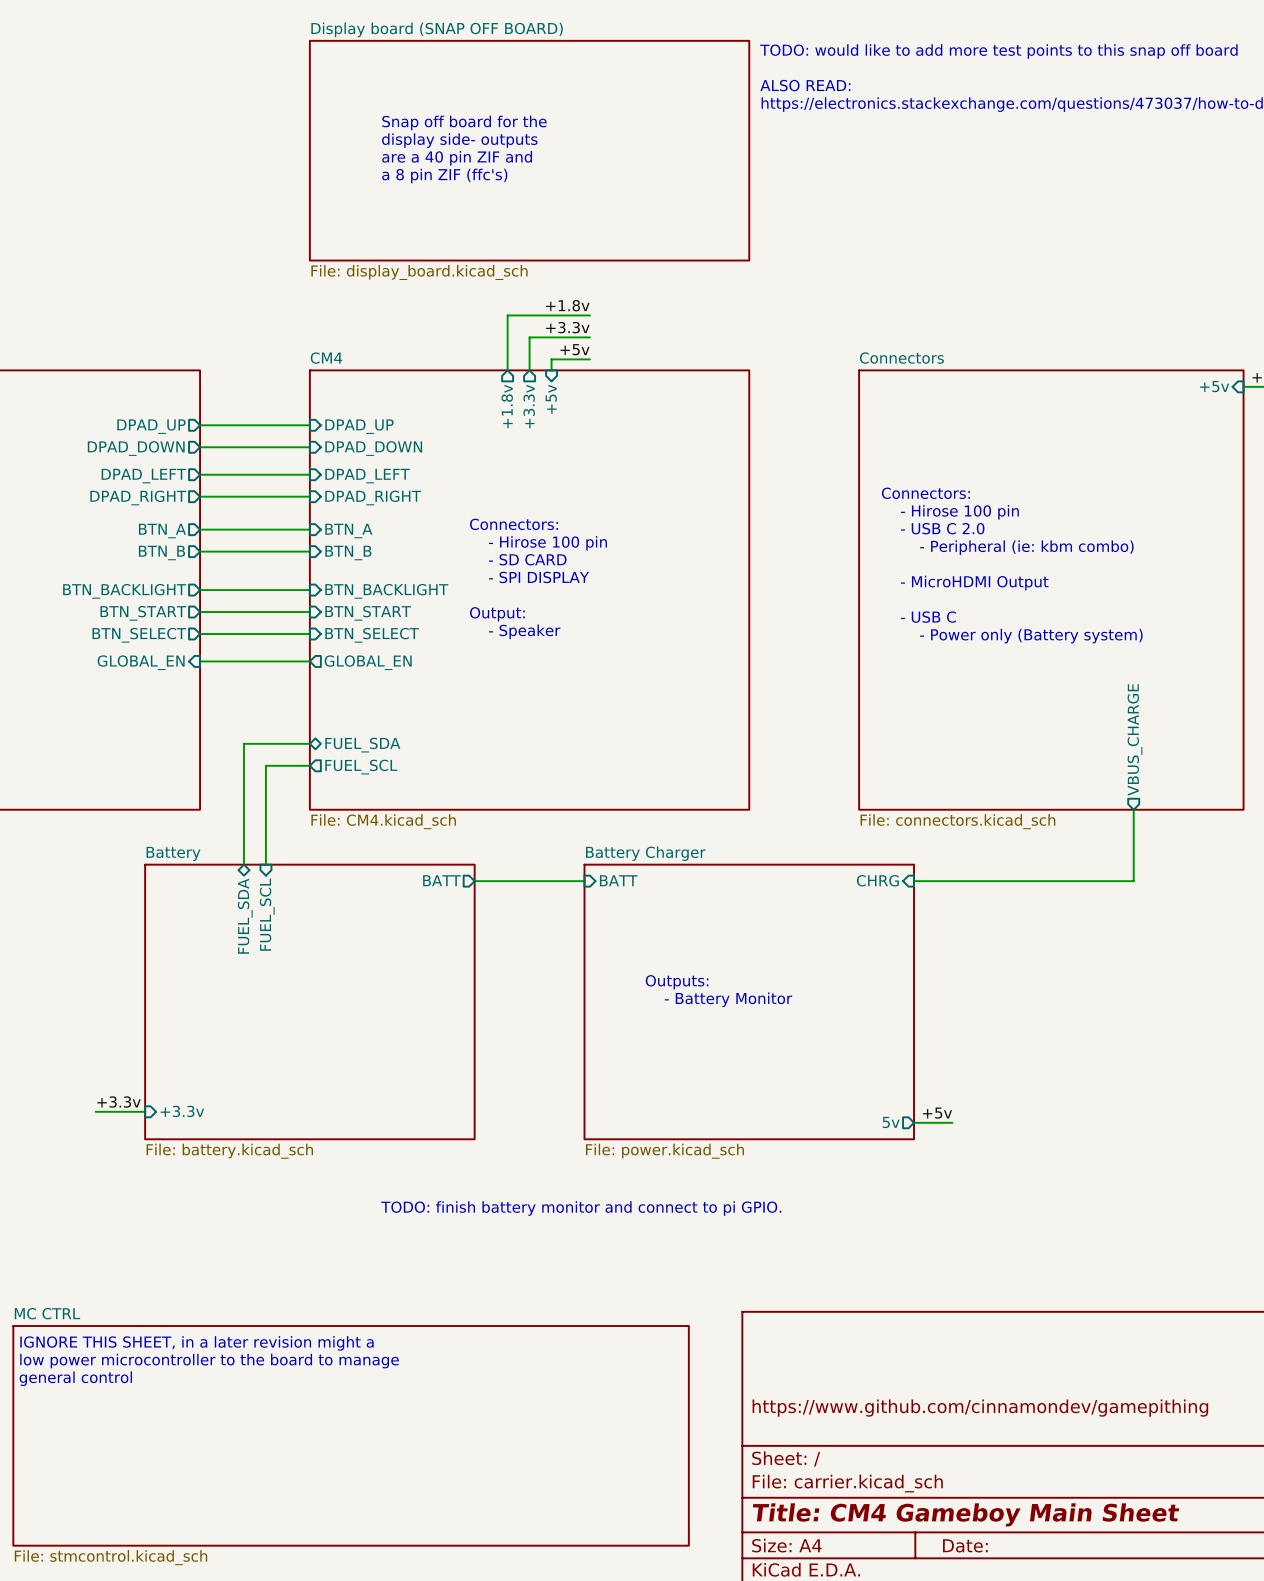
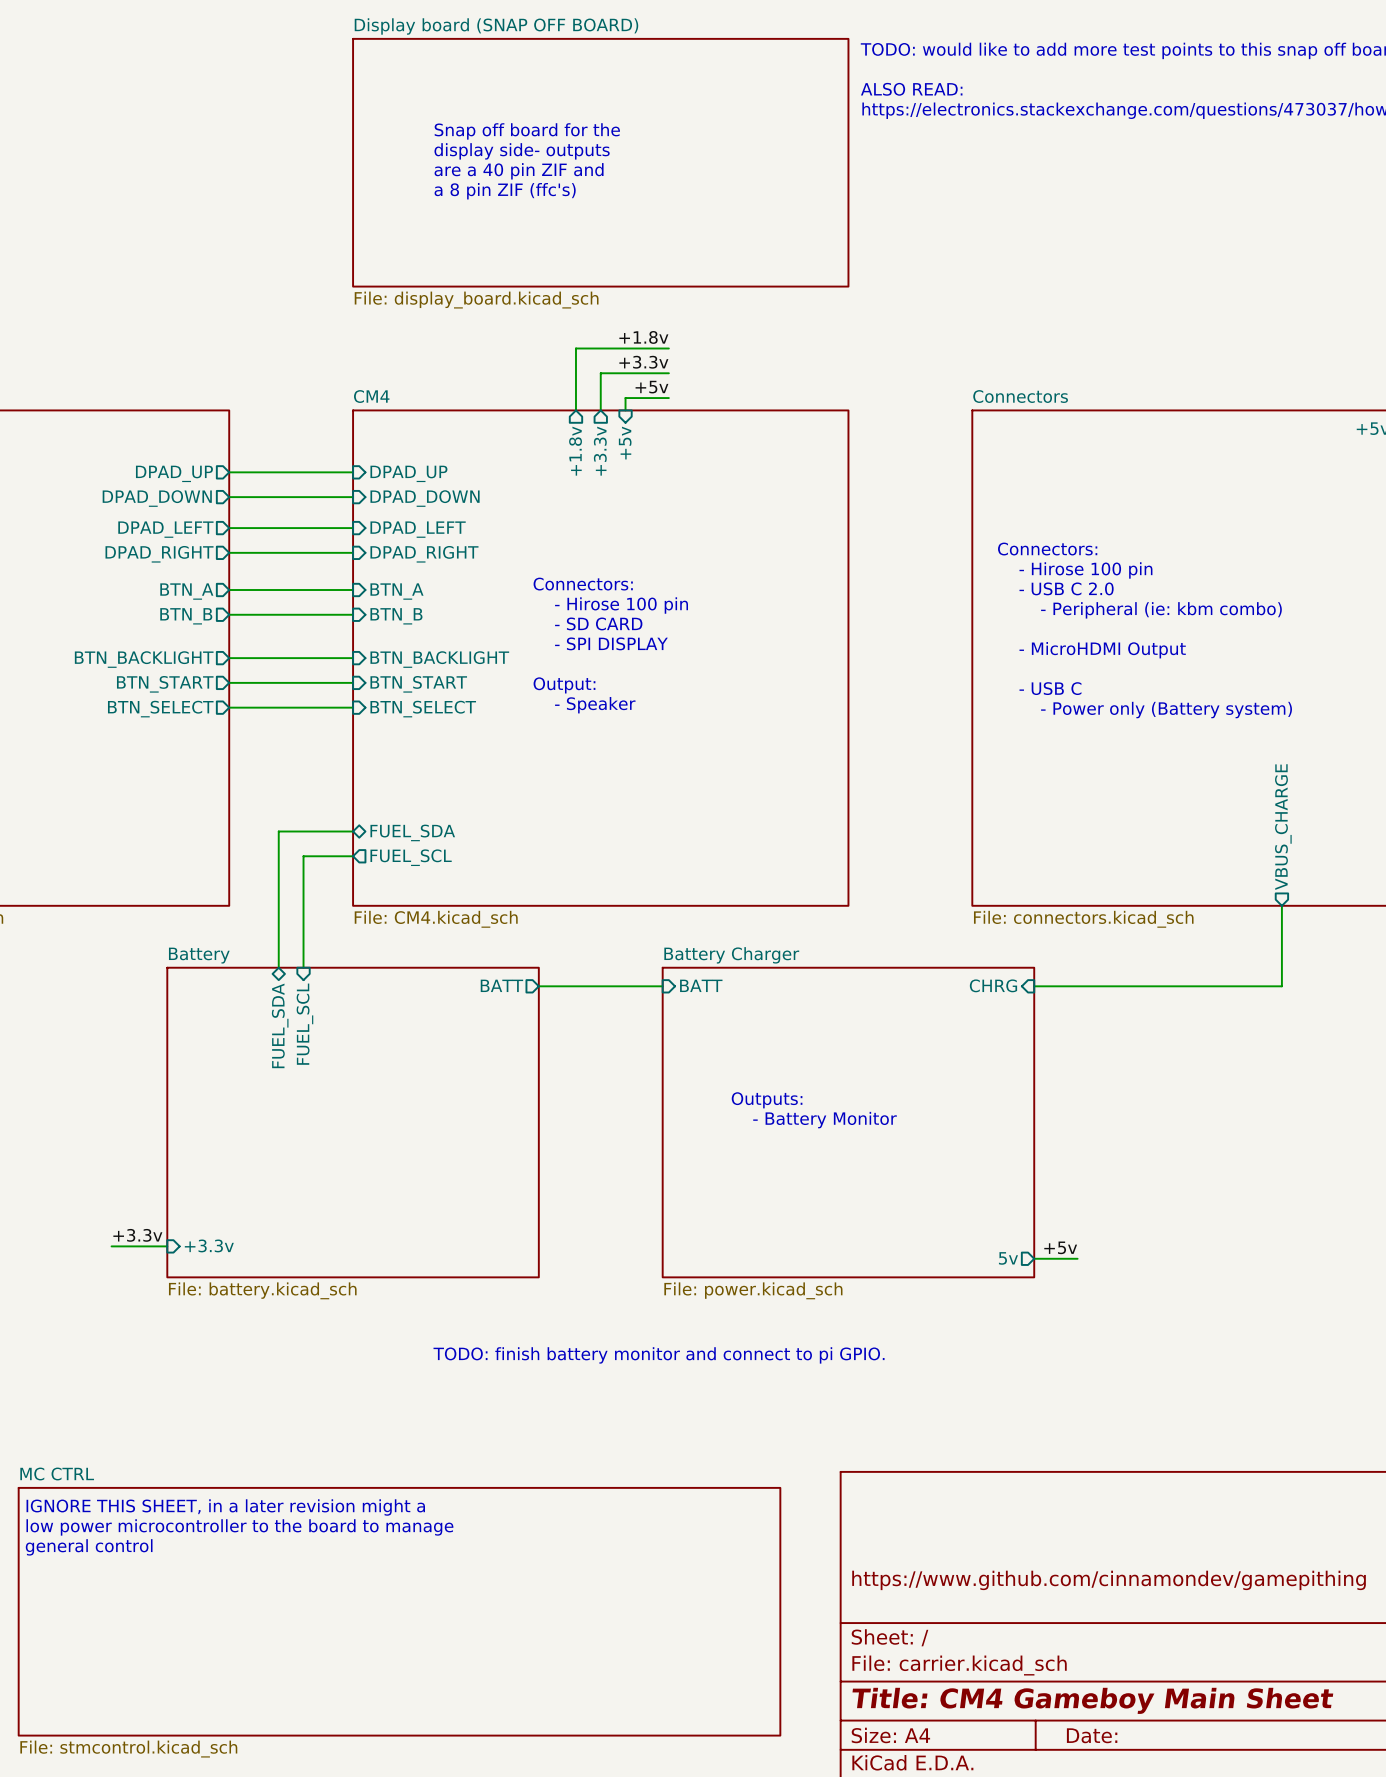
wire: (200, 661) (309, 661) -> none
sheet pin: GLOBAL_EN (141, 662) -> none
sheet pin: GLOBAL_EN (368, 662) -> none

